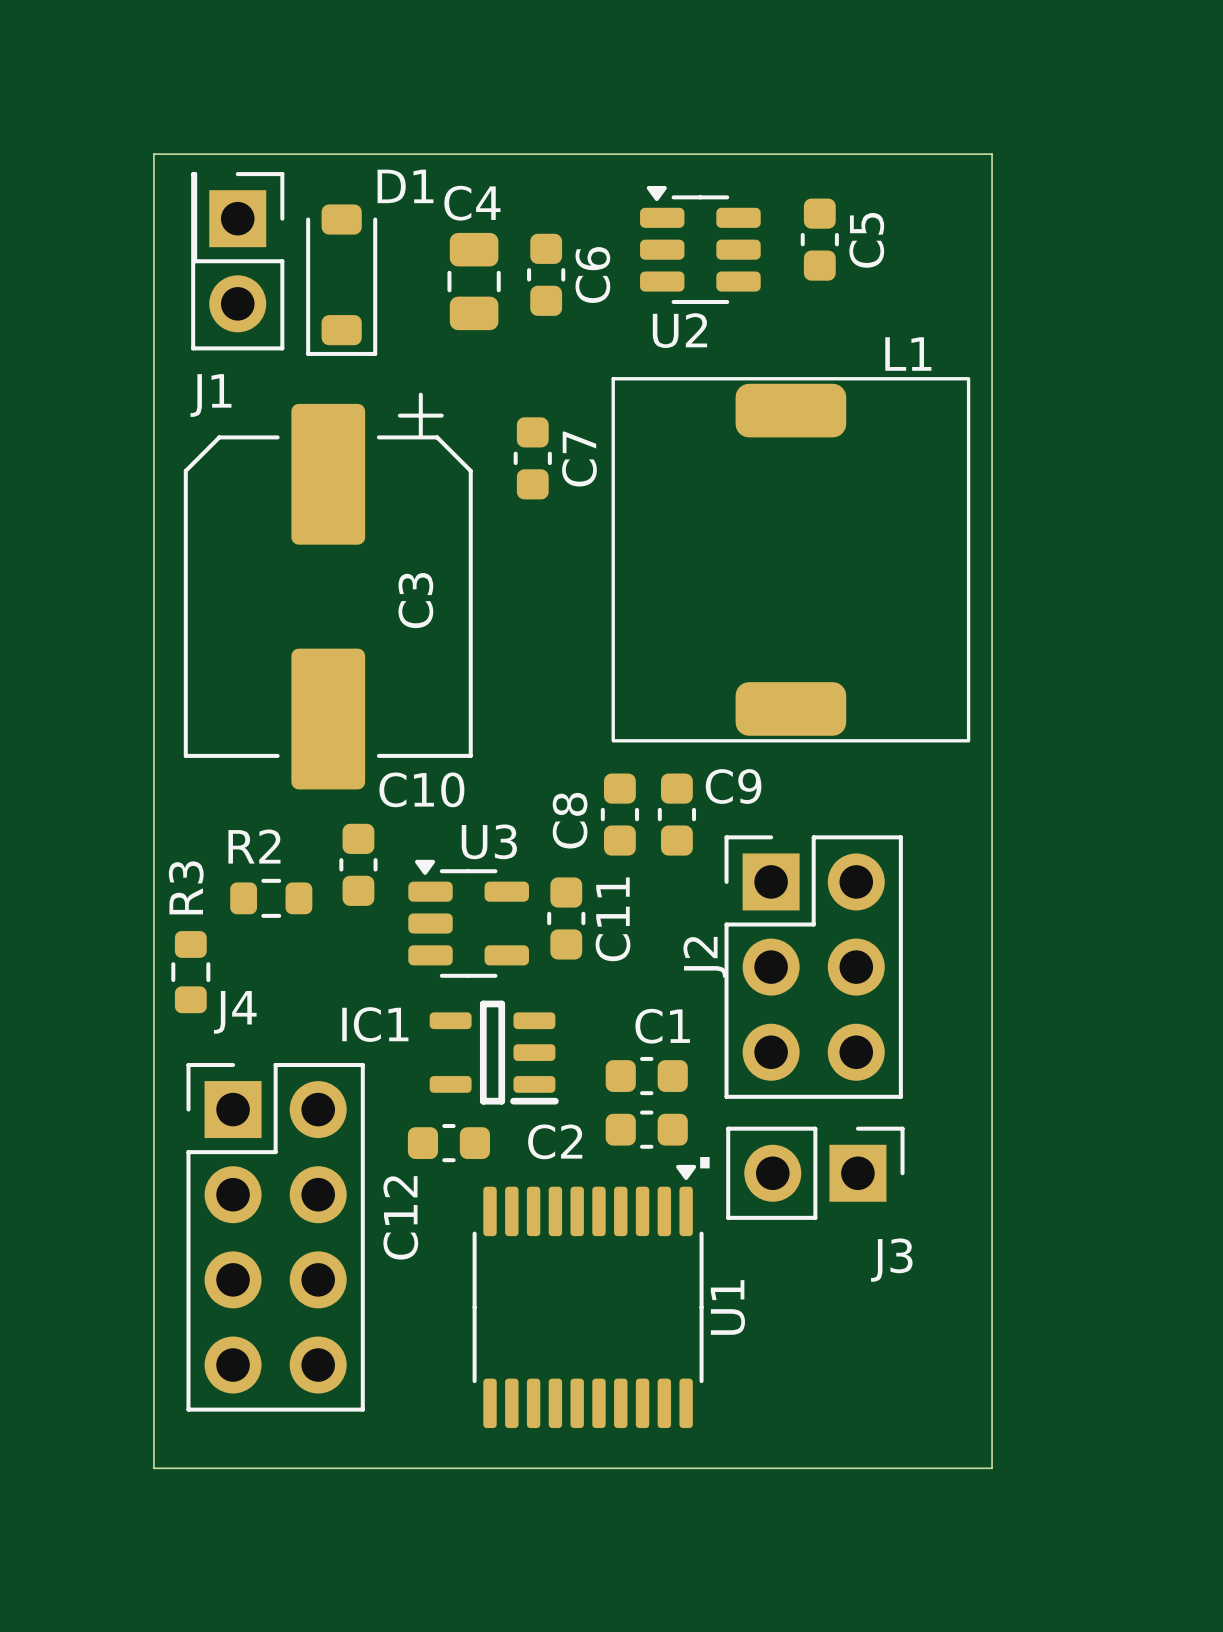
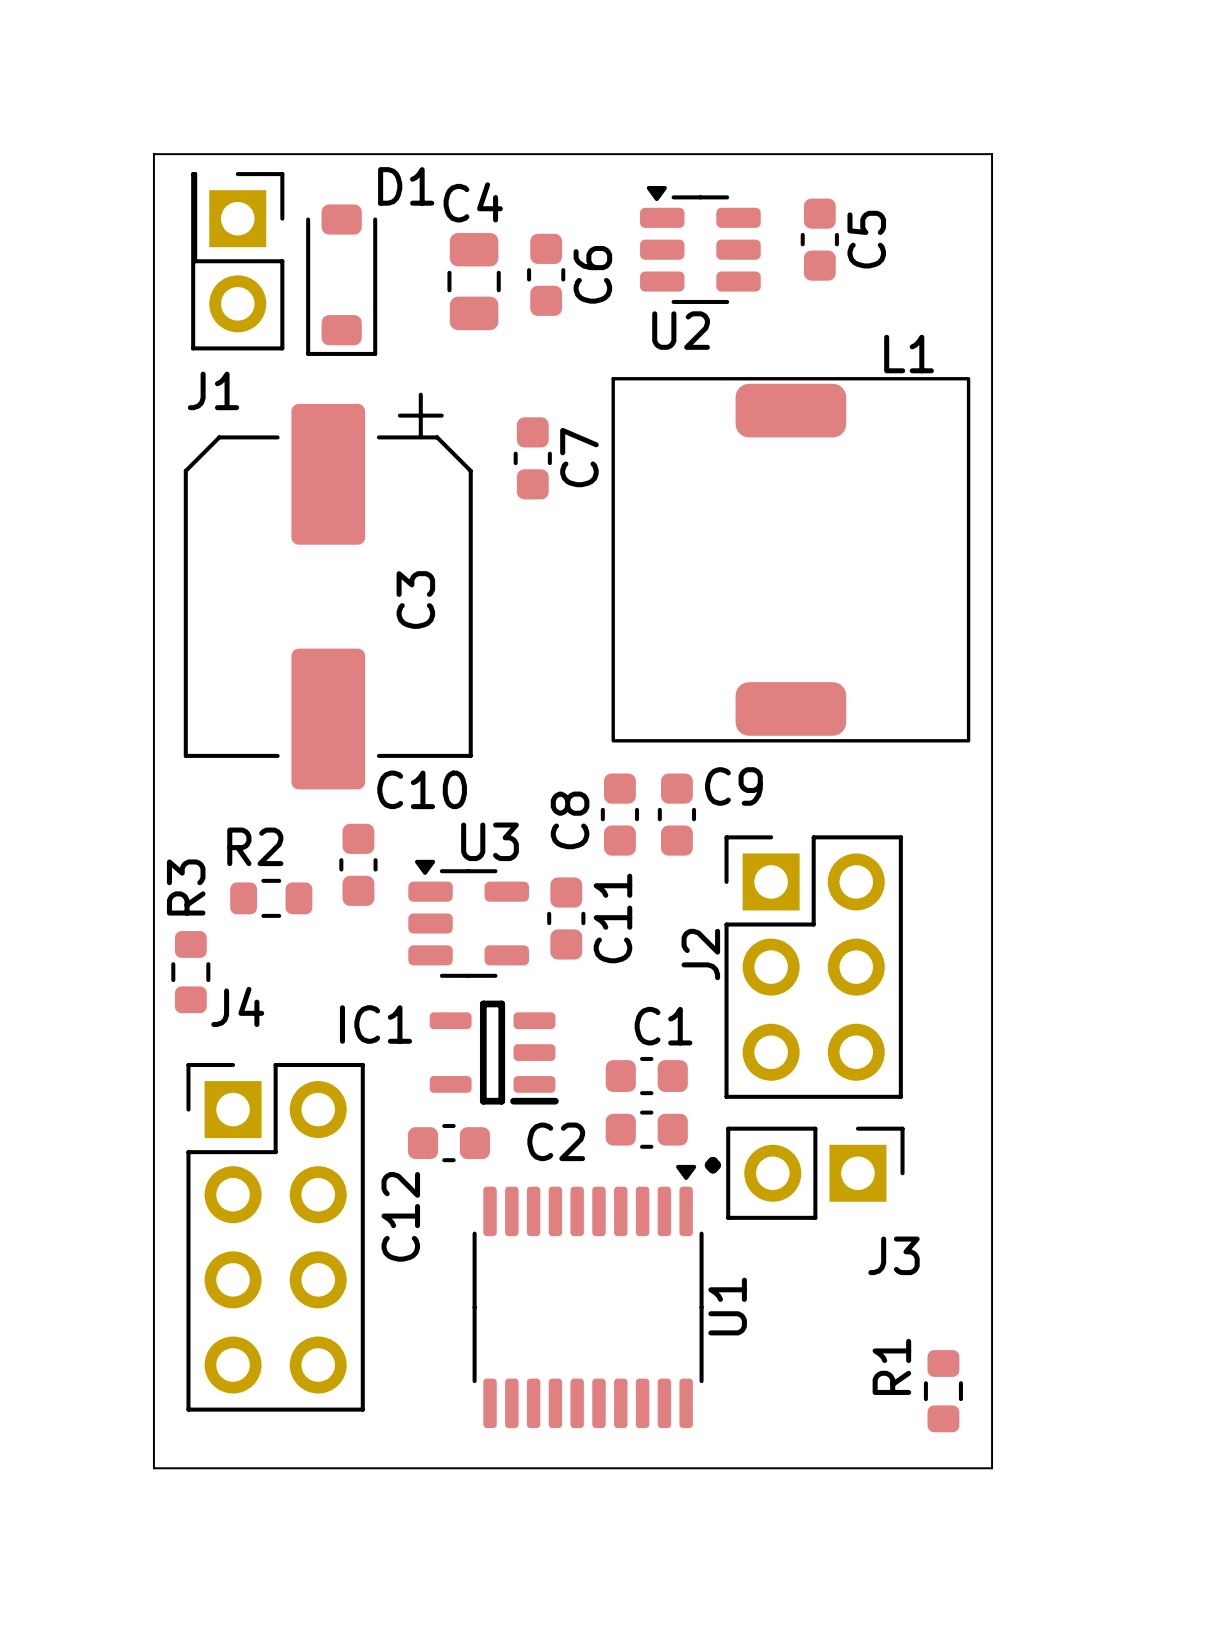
R1: none -> (943, 1391)

